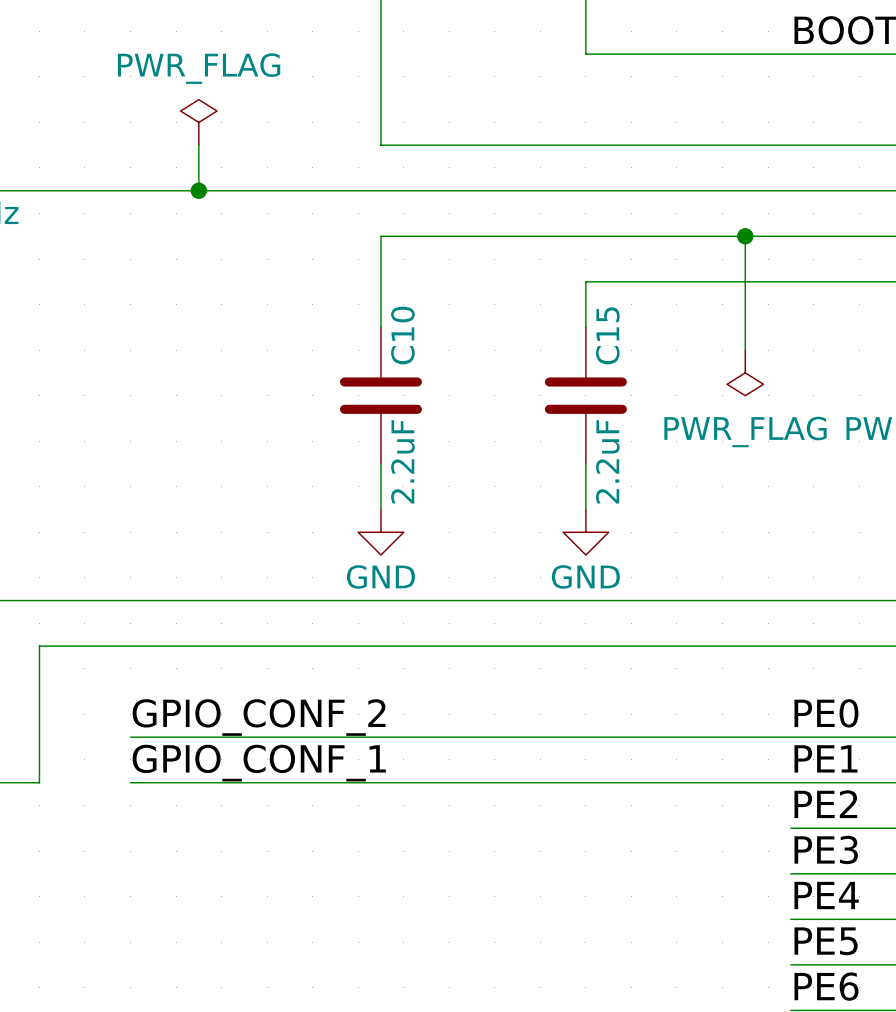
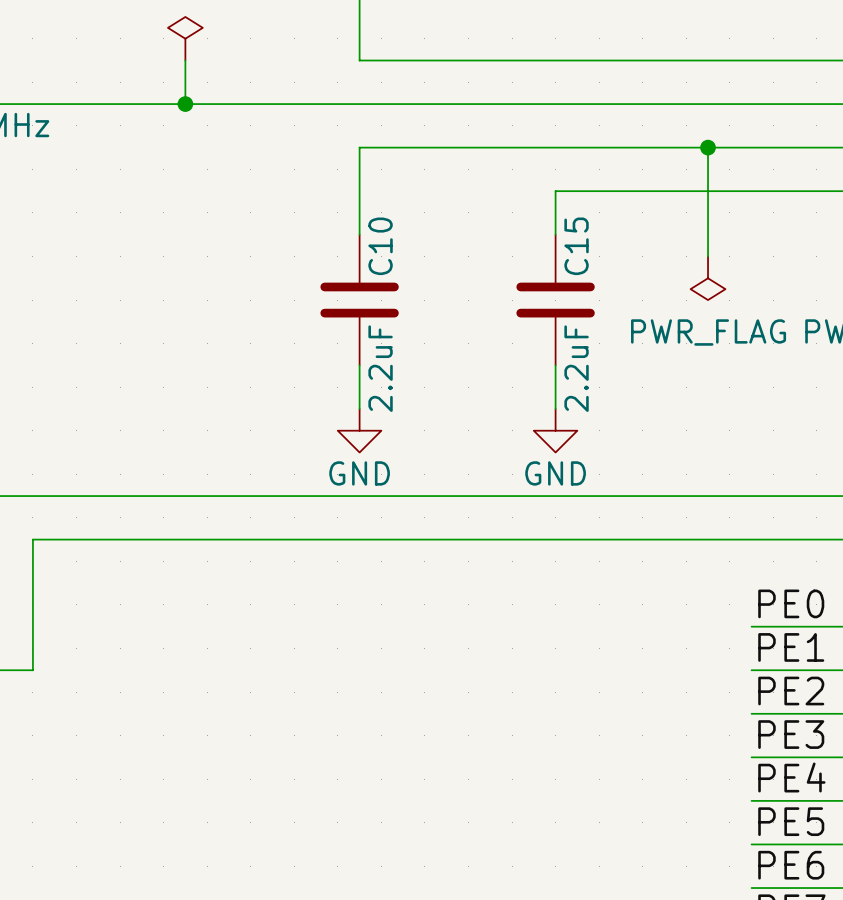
label: GPIO_CONF_2 (259, 717) -> none
wire: (130, 737) (790, 737) -> none
label: GPIO_CONF_1 (259, 763) -> none
wire: (130, 782) (790, 782) -> none

